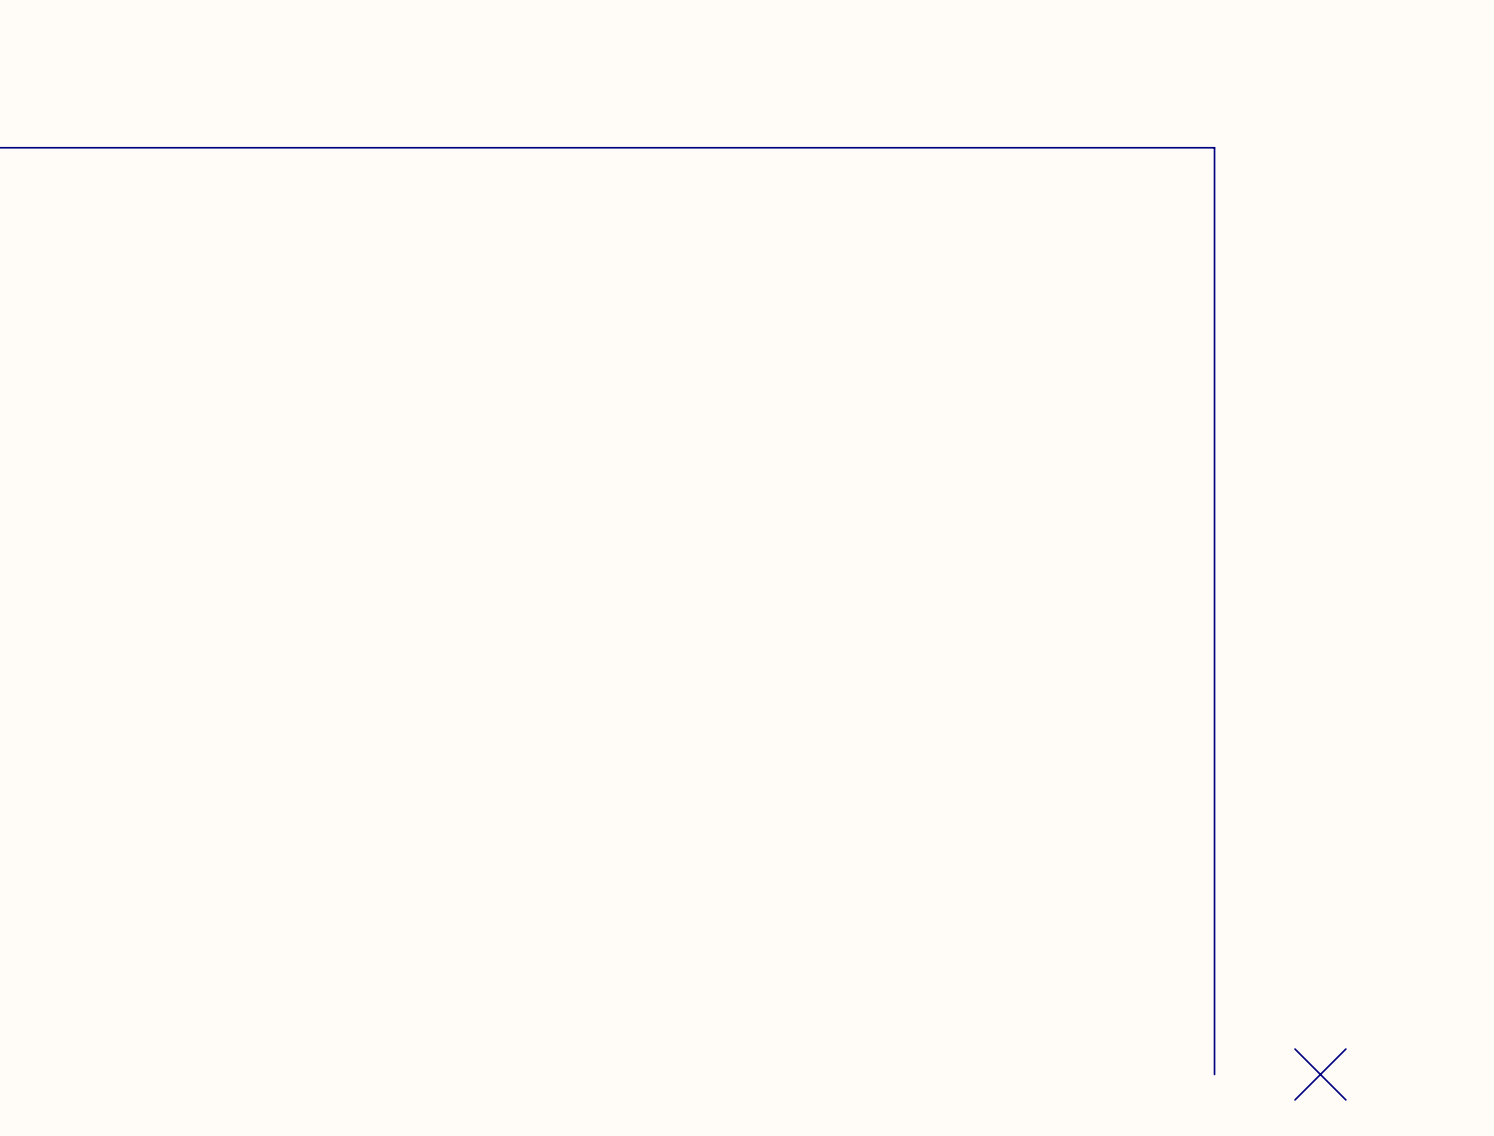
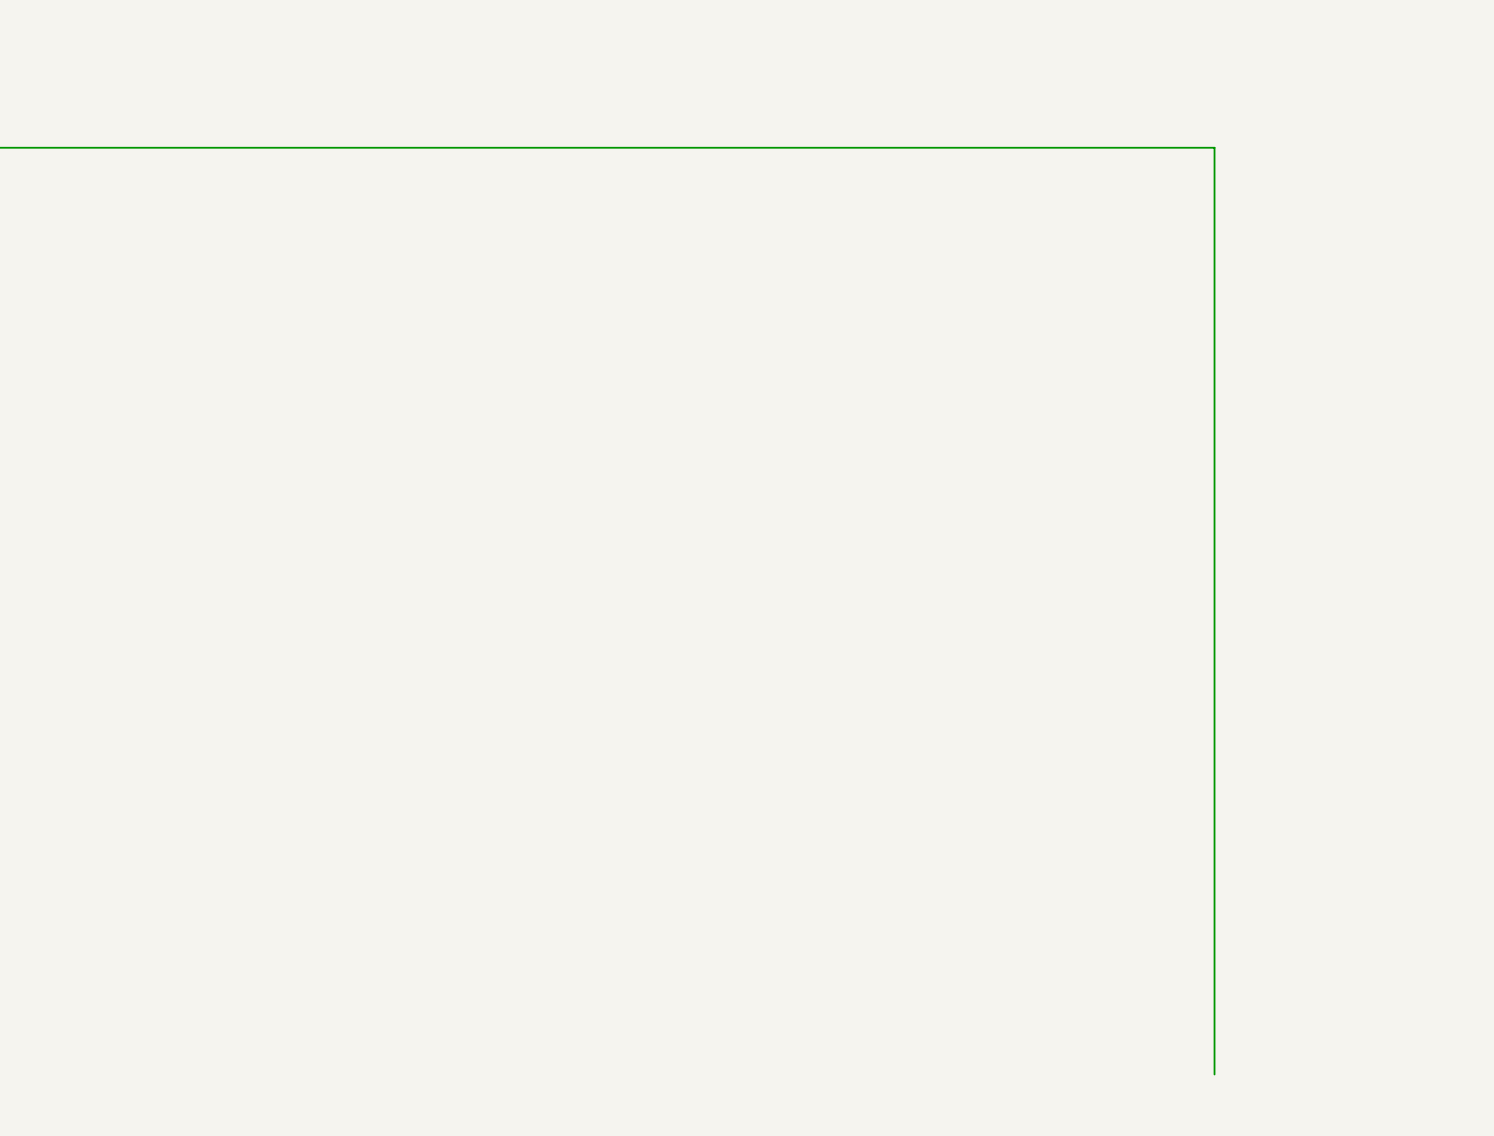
no-connect mark: (1320, 1074) -> none

